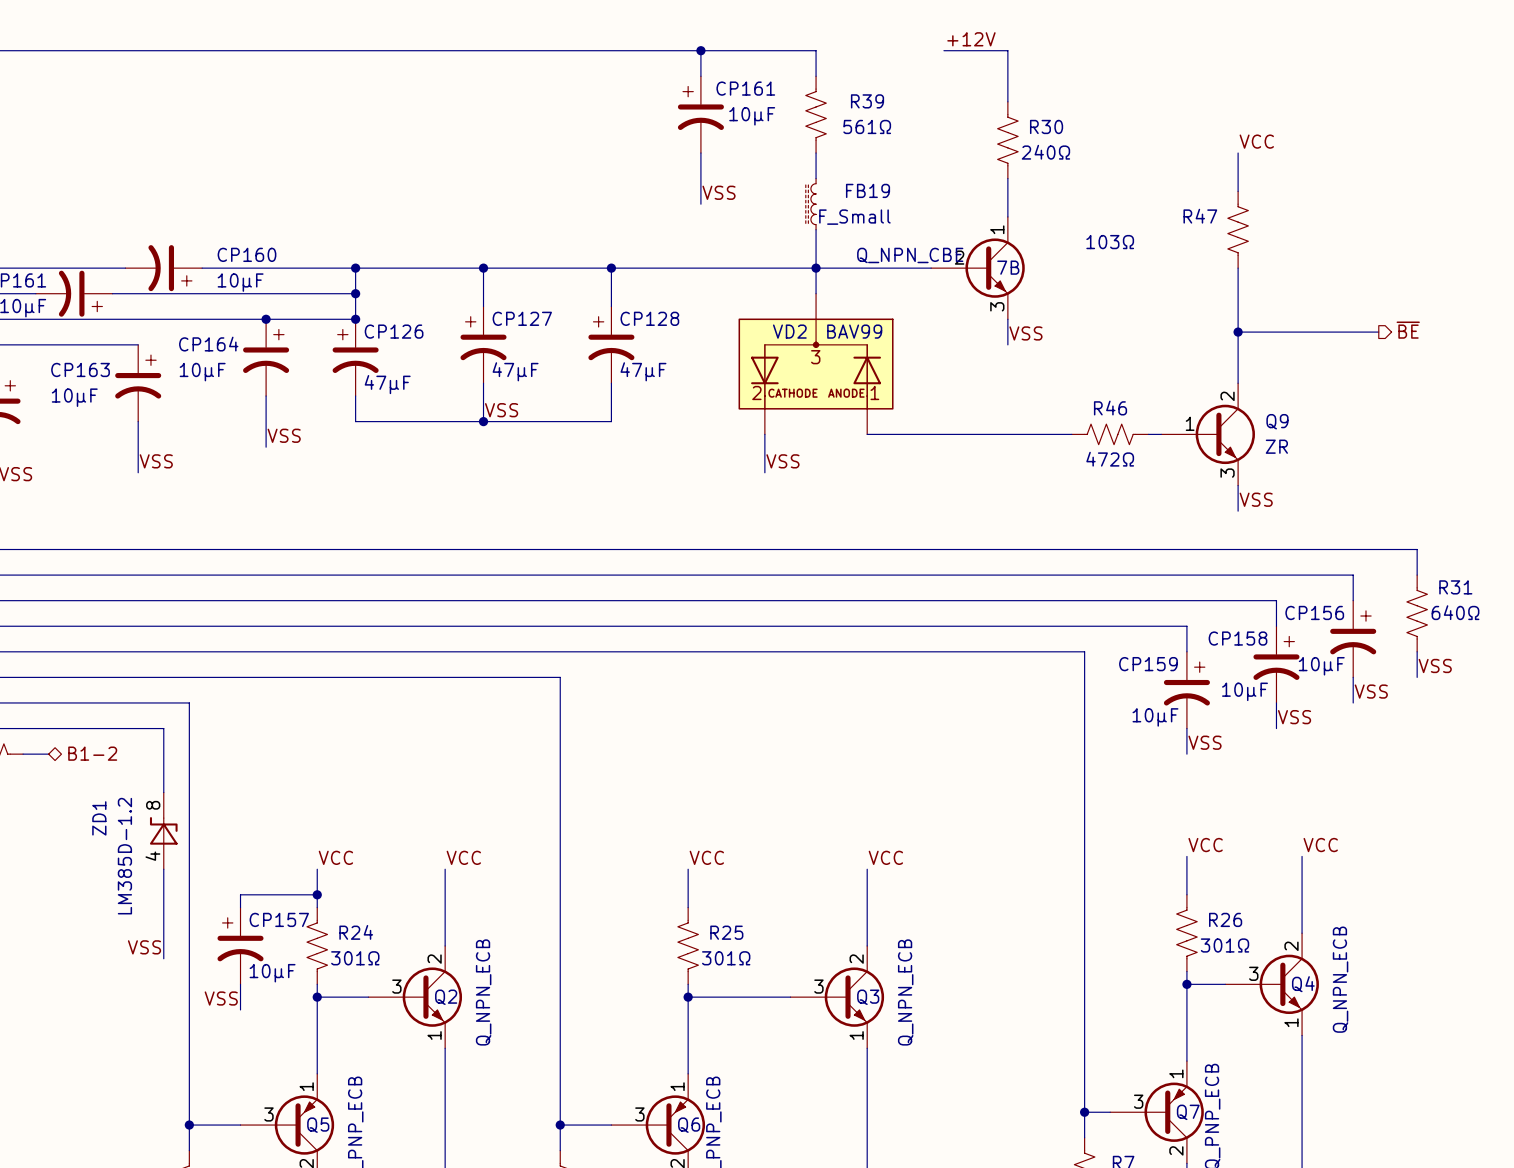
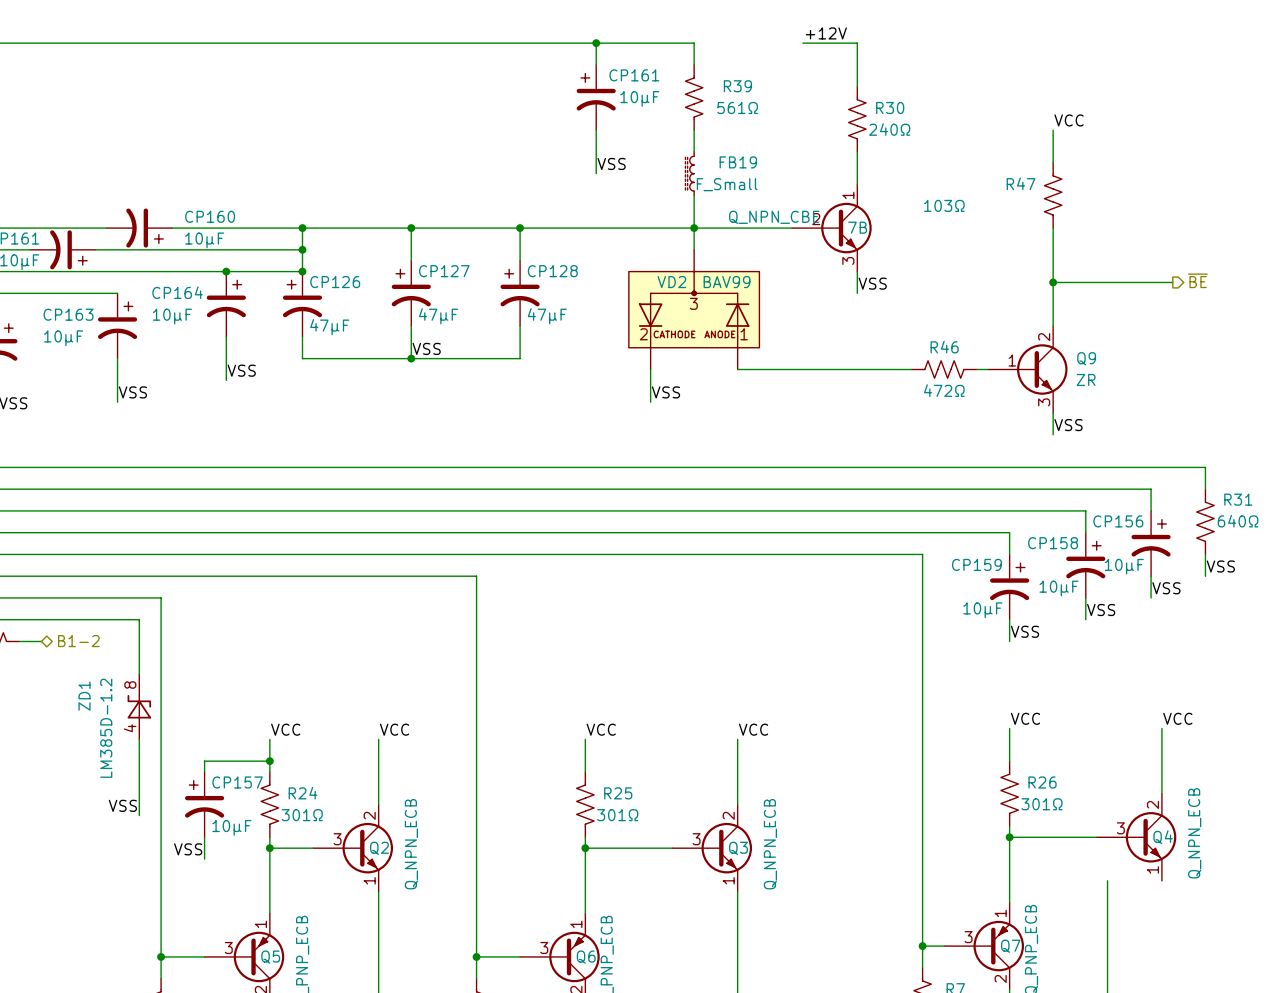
label position: VCC (1320, 845) -> VCC (1177, 718)
wire: (1302, 856) (1302, 933) -> (1161, 728) (1161, 793)
Q4 position: (1272, 984) -> (1136, 837)

